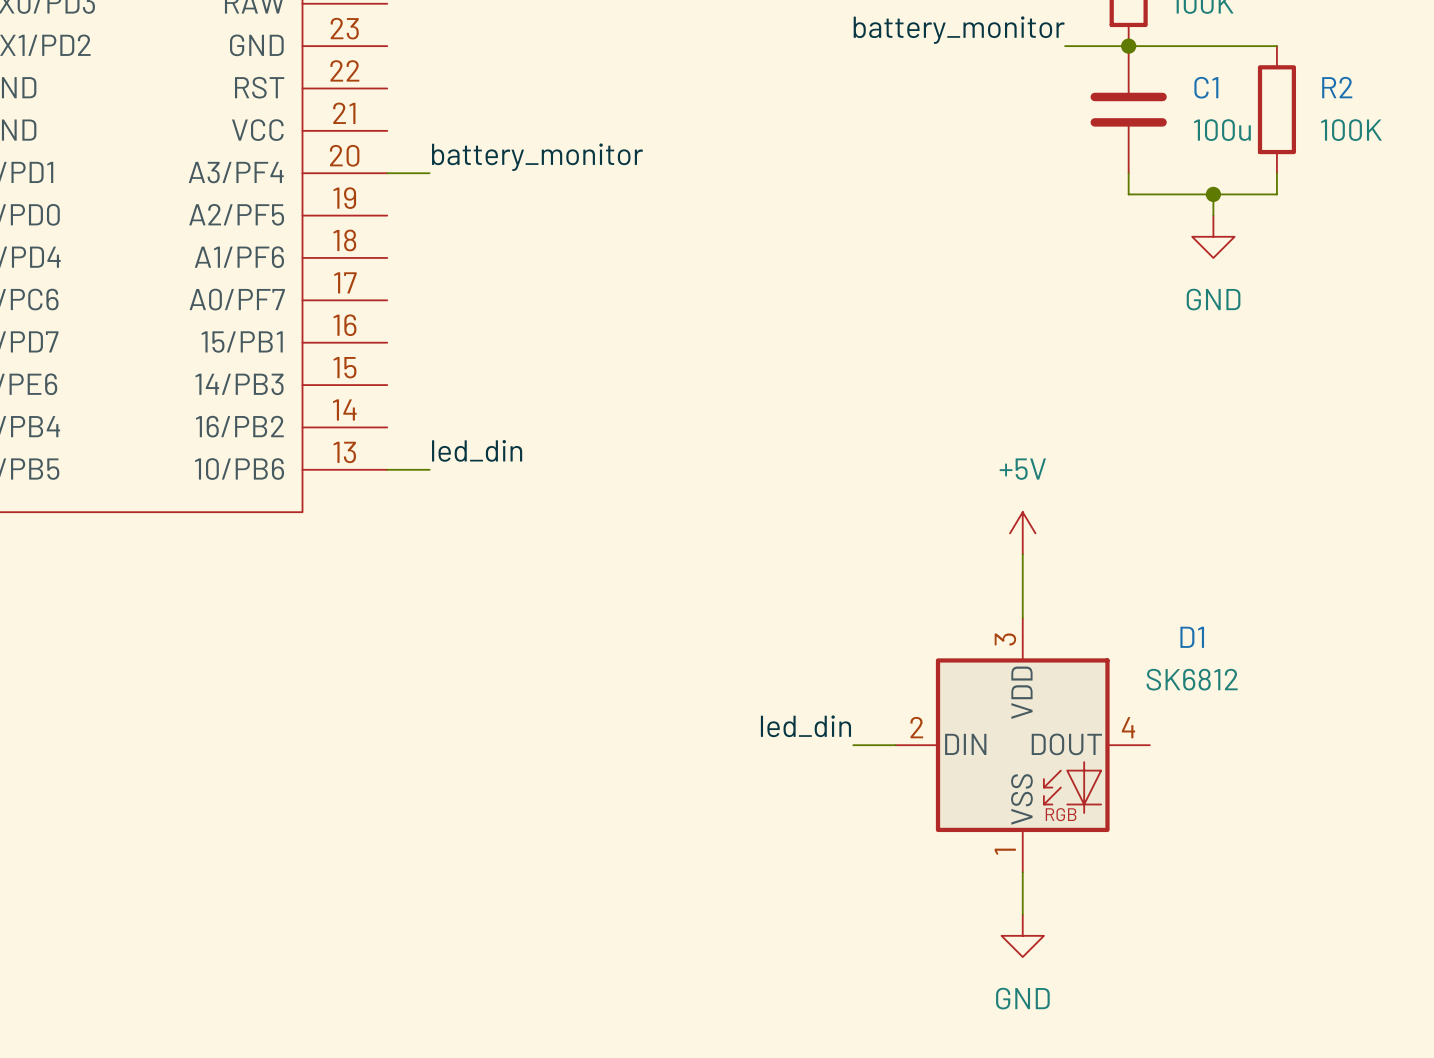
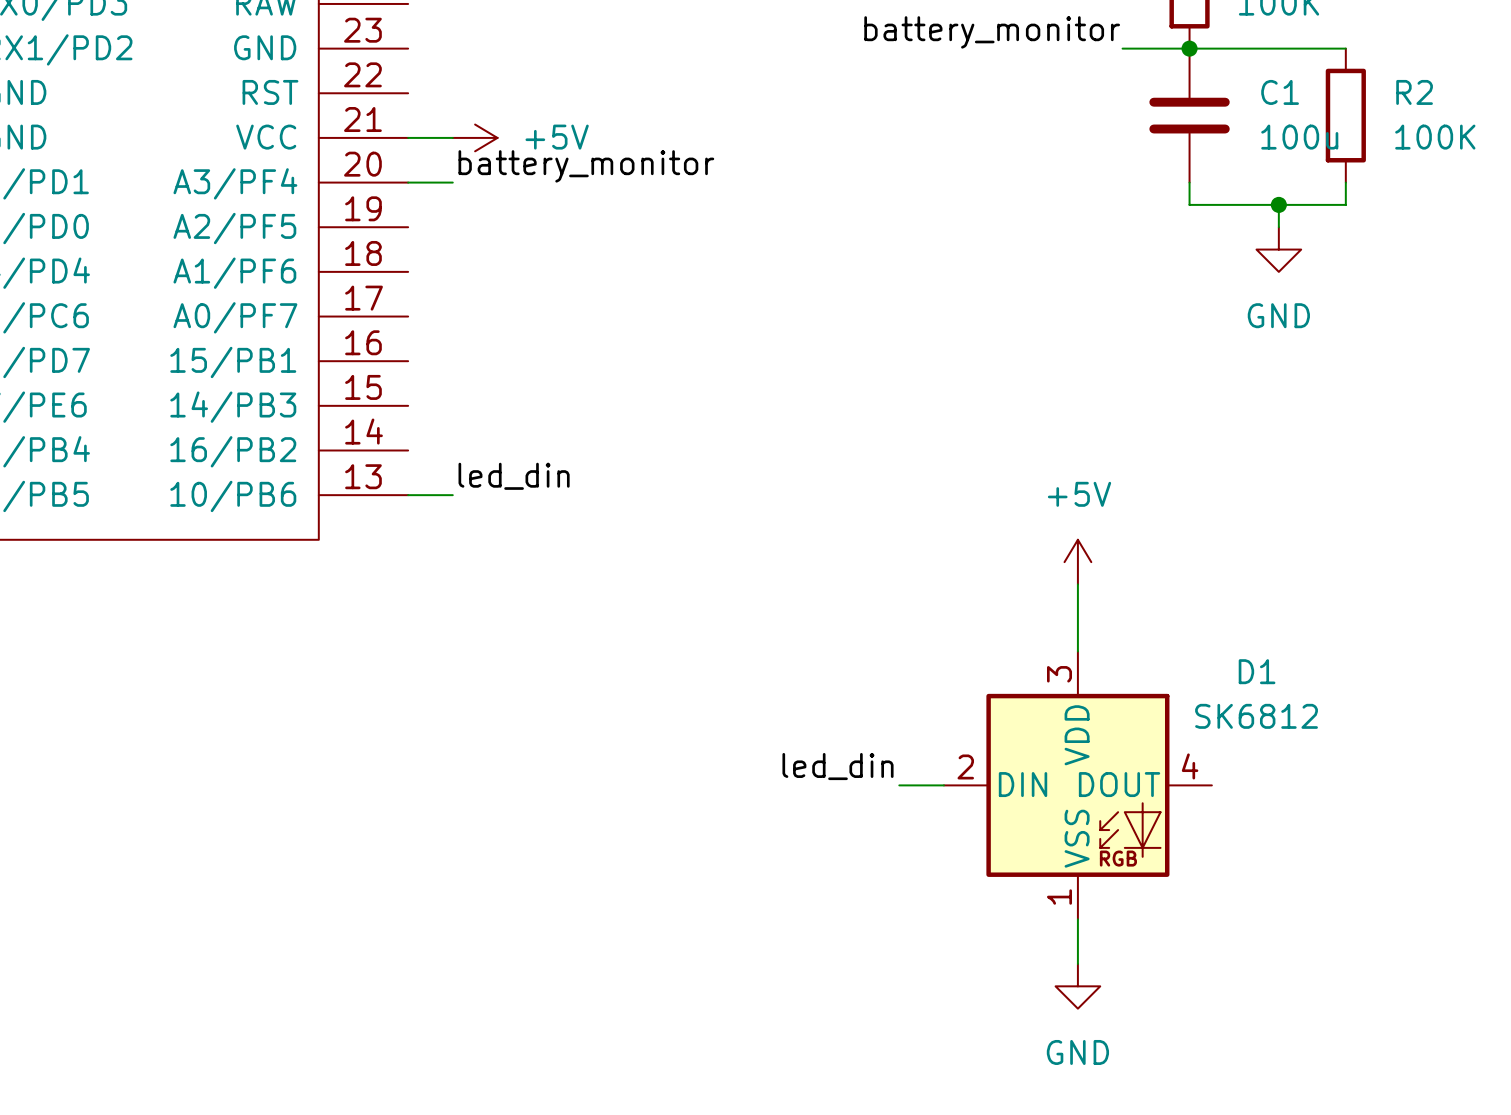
wire: none -> (408, 137) (452, 137)
power symbol: none -> +5V (475, 137)

